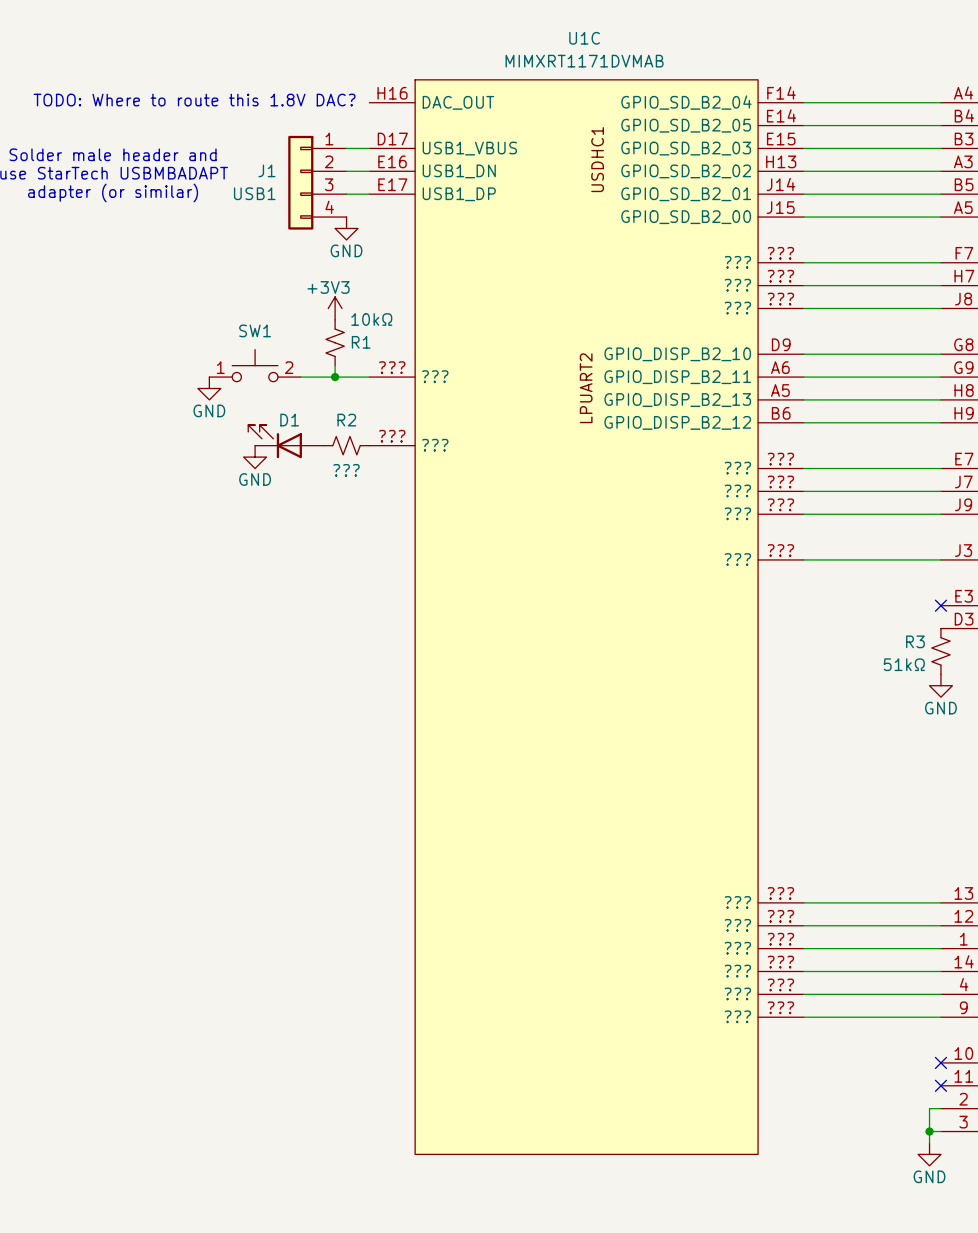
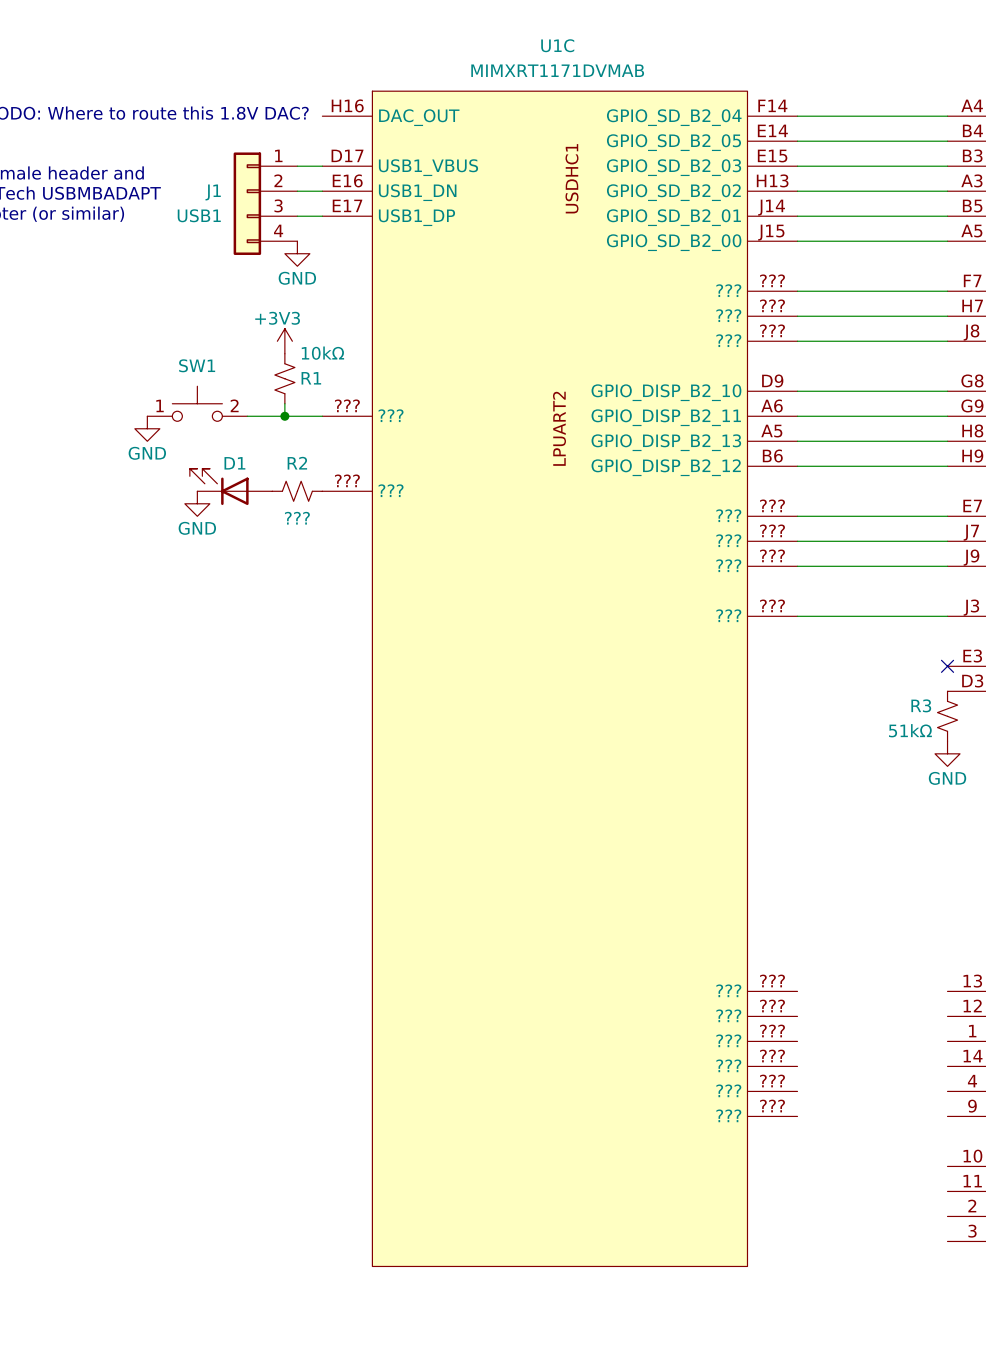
wire: (803, 902) (940, 902) -> none
wire: (803, 925) (940, 925) -> none
wire: (803, 948) (940, 948) -> none
wire: (803, 971) (940, 971) -> none
wire: (803, 994) (940, 994) -> none
wire: (803, 1017) (940, 1017) -> none
no-connect mark: (940, 1062) -> none
no-connect mark: (940, 1085) -> none
wire: (940, 1108) (929, 1108) (929, 1142) -> none
wire: (929, 1131) (940, 1131) -> none
junction: (929, 1131) -> none
power symbol: GND (929, 1154) -> none

